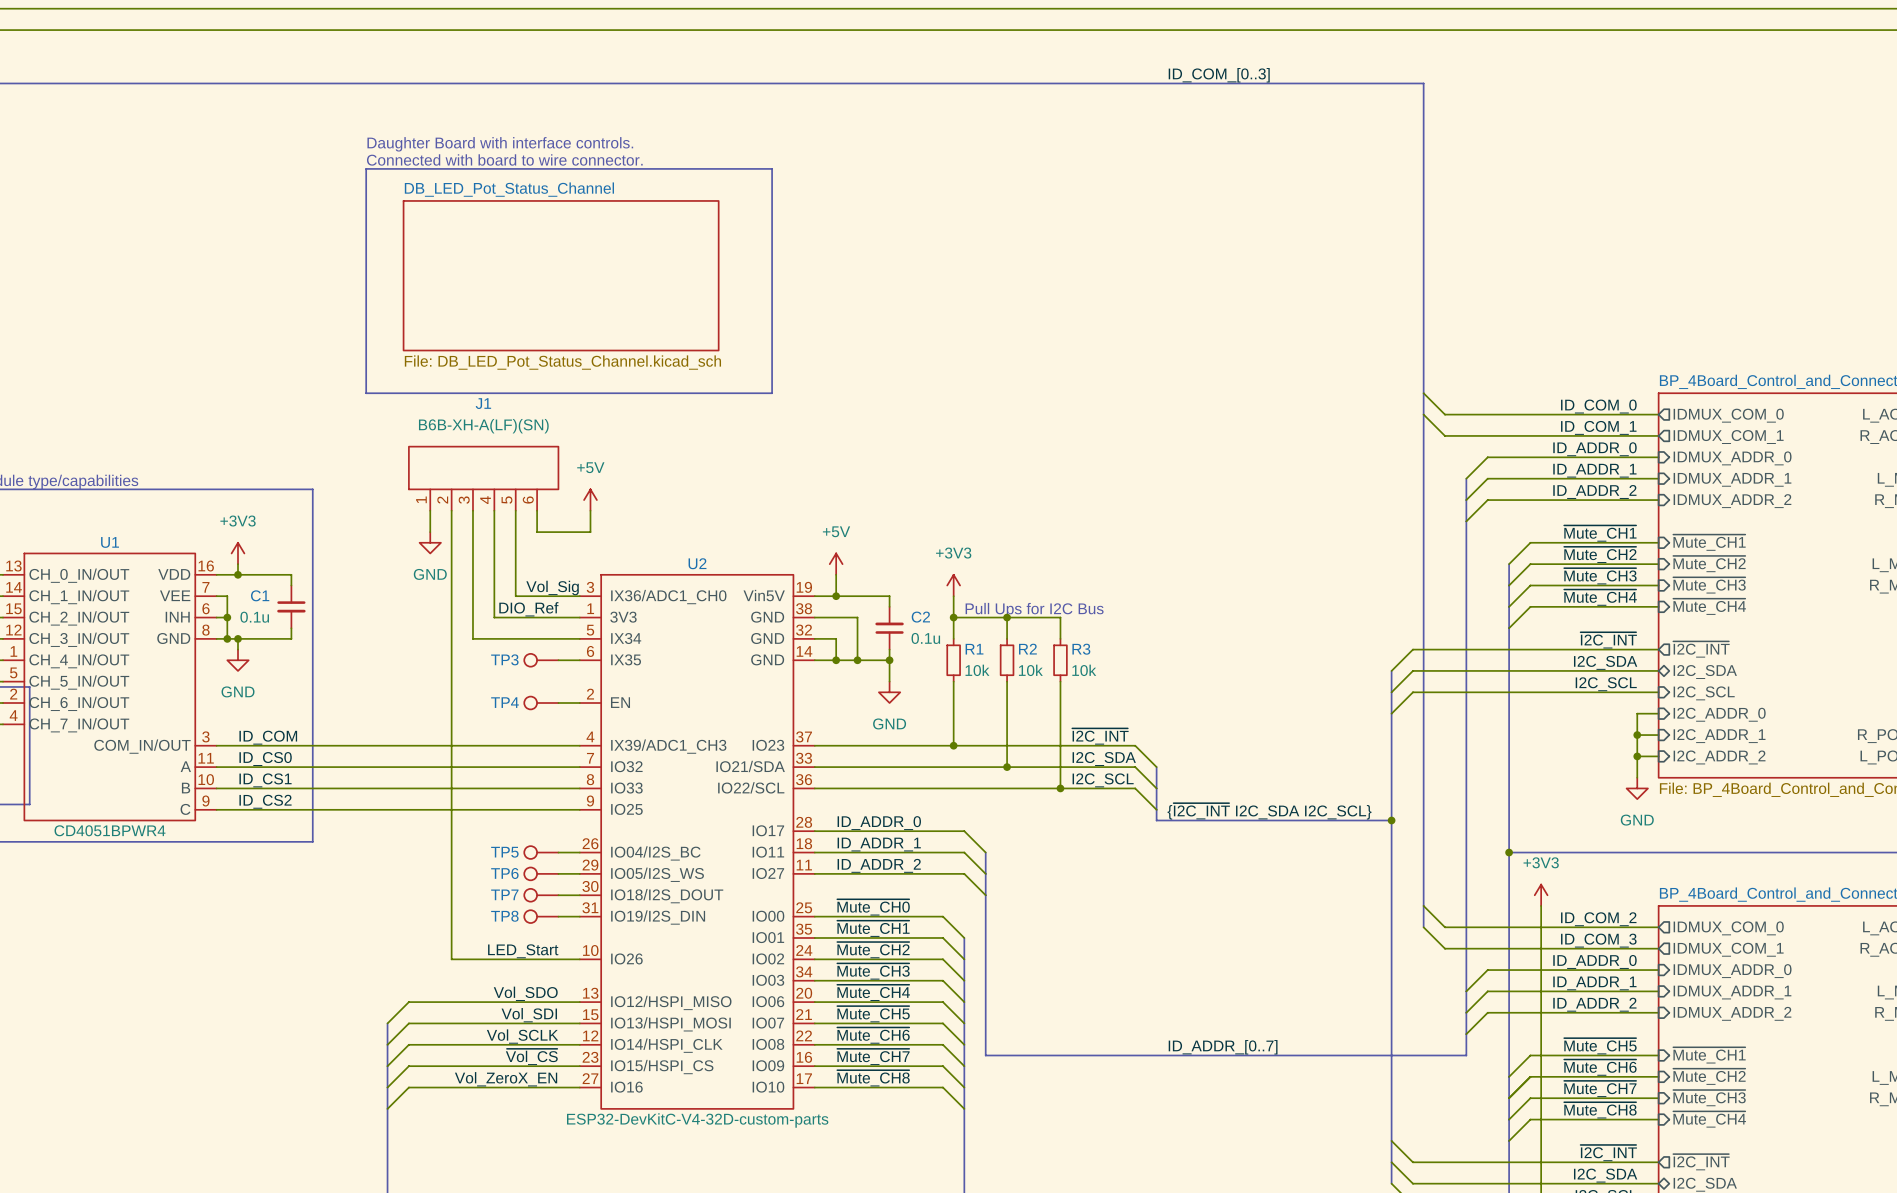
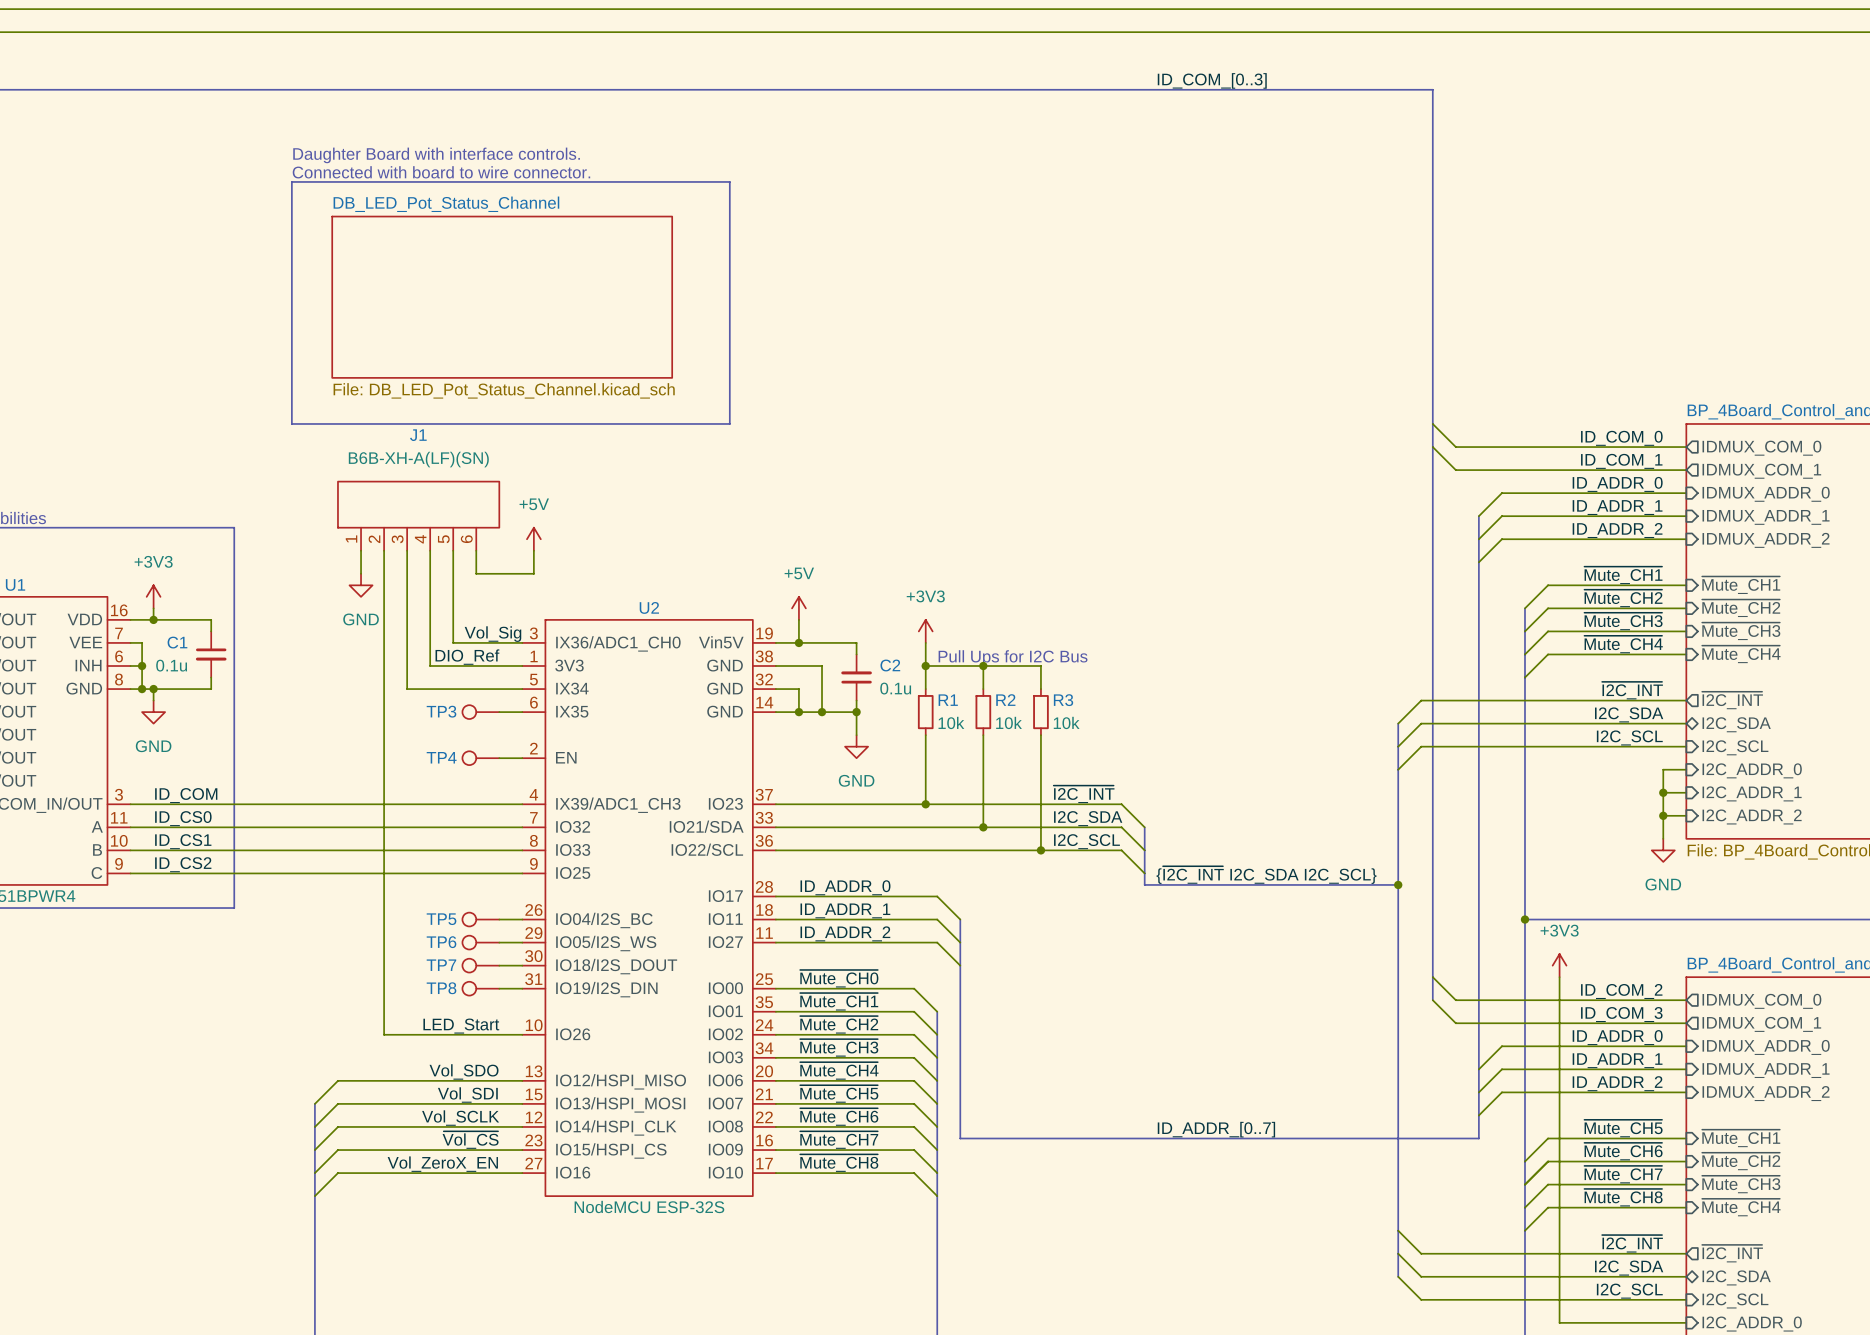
U2 value: ESP32-DevKitC-V4-32D-custom-parts (697, 1120) -> NodeMCU ESP-32S (649, 1206)

